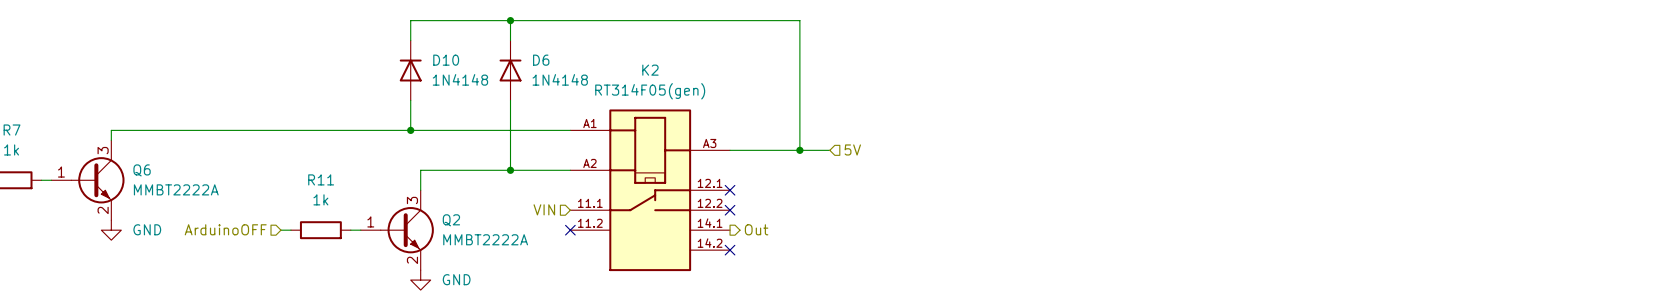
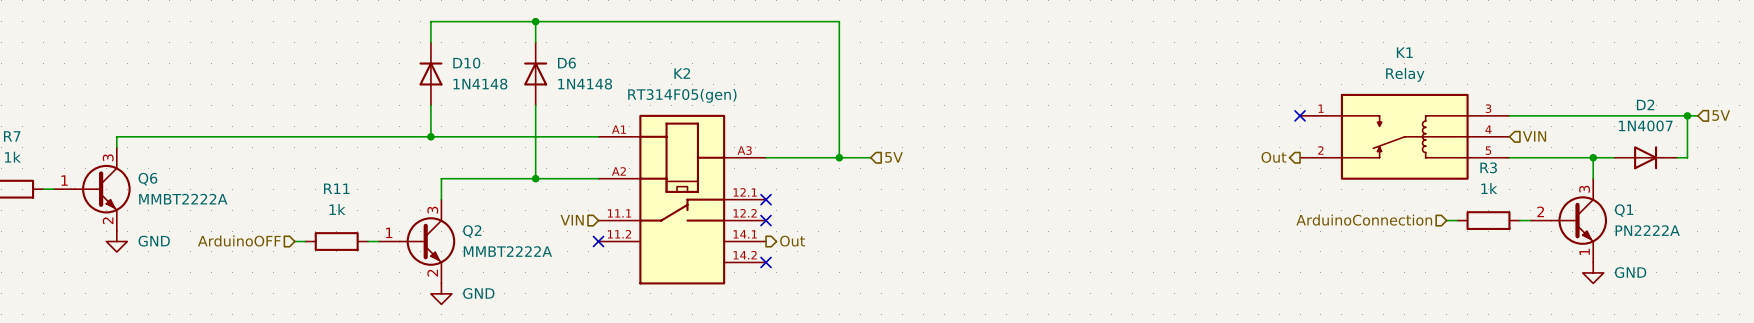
no-connect mark: none -> (1300, 115)
wire: none -> (1509, 115) (1697, 115)
wire: none -> (1687, 115) (1687, 157) (1676, 157)
junction: none -> (1687, 115)
hierarchical label: none -> 5V (1721, 115)
K1: none -> Relay (1404, 136)
hierarchical label: none -> VIN (1534, 136)
hierarchical label: none -> Out (1273, 157)
wire: none -> (1509, 157) (1614, 157)
wire: none -> (1593, 157) (1593, 178)
junction: none -> (1593, 157)
D2: none -> 1N4007 (1645, 157)
hierarchical label: none -> ArduinoConnection (1364, 220)
wire: none -> (1446, 220) (1457, 220)
R3: none -> 1k (1488, 220)
wire: none -> (1519, 220) (1530, 220)
Q1: none -> PN2222A (1568, 220)
power symbol: none -> GND (1593, 272)

